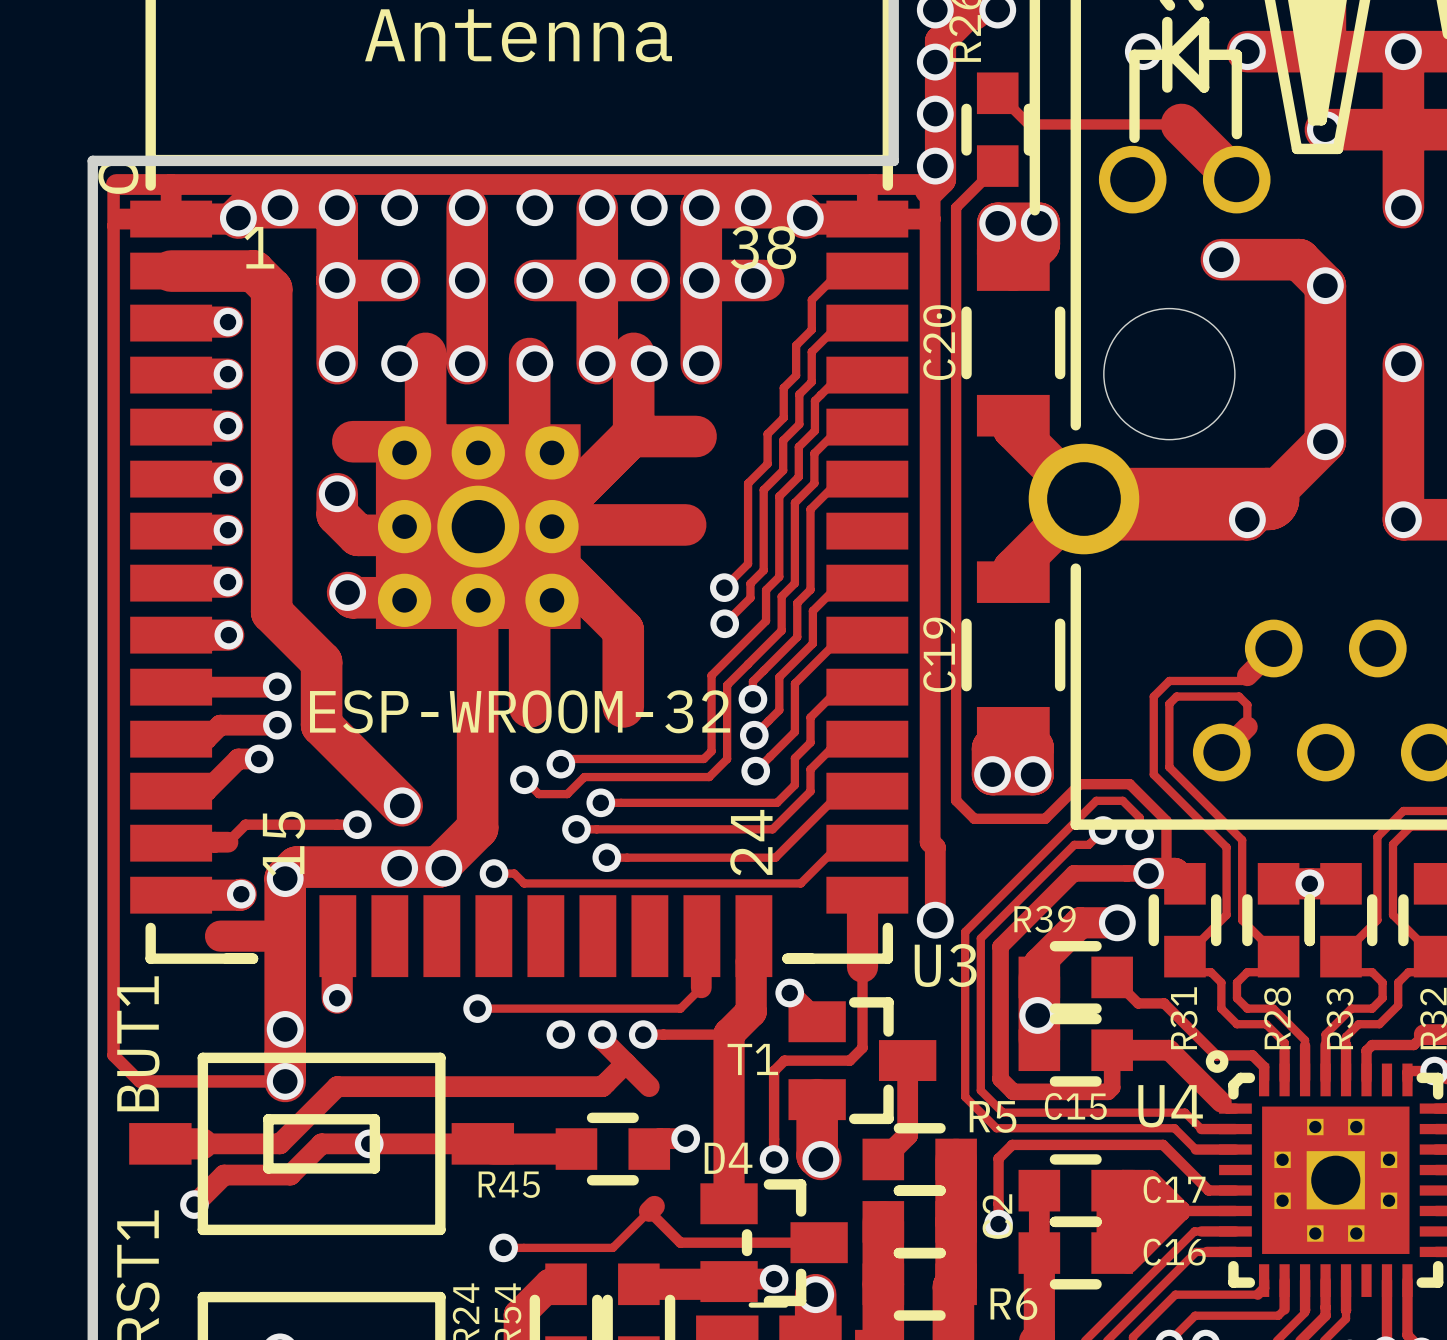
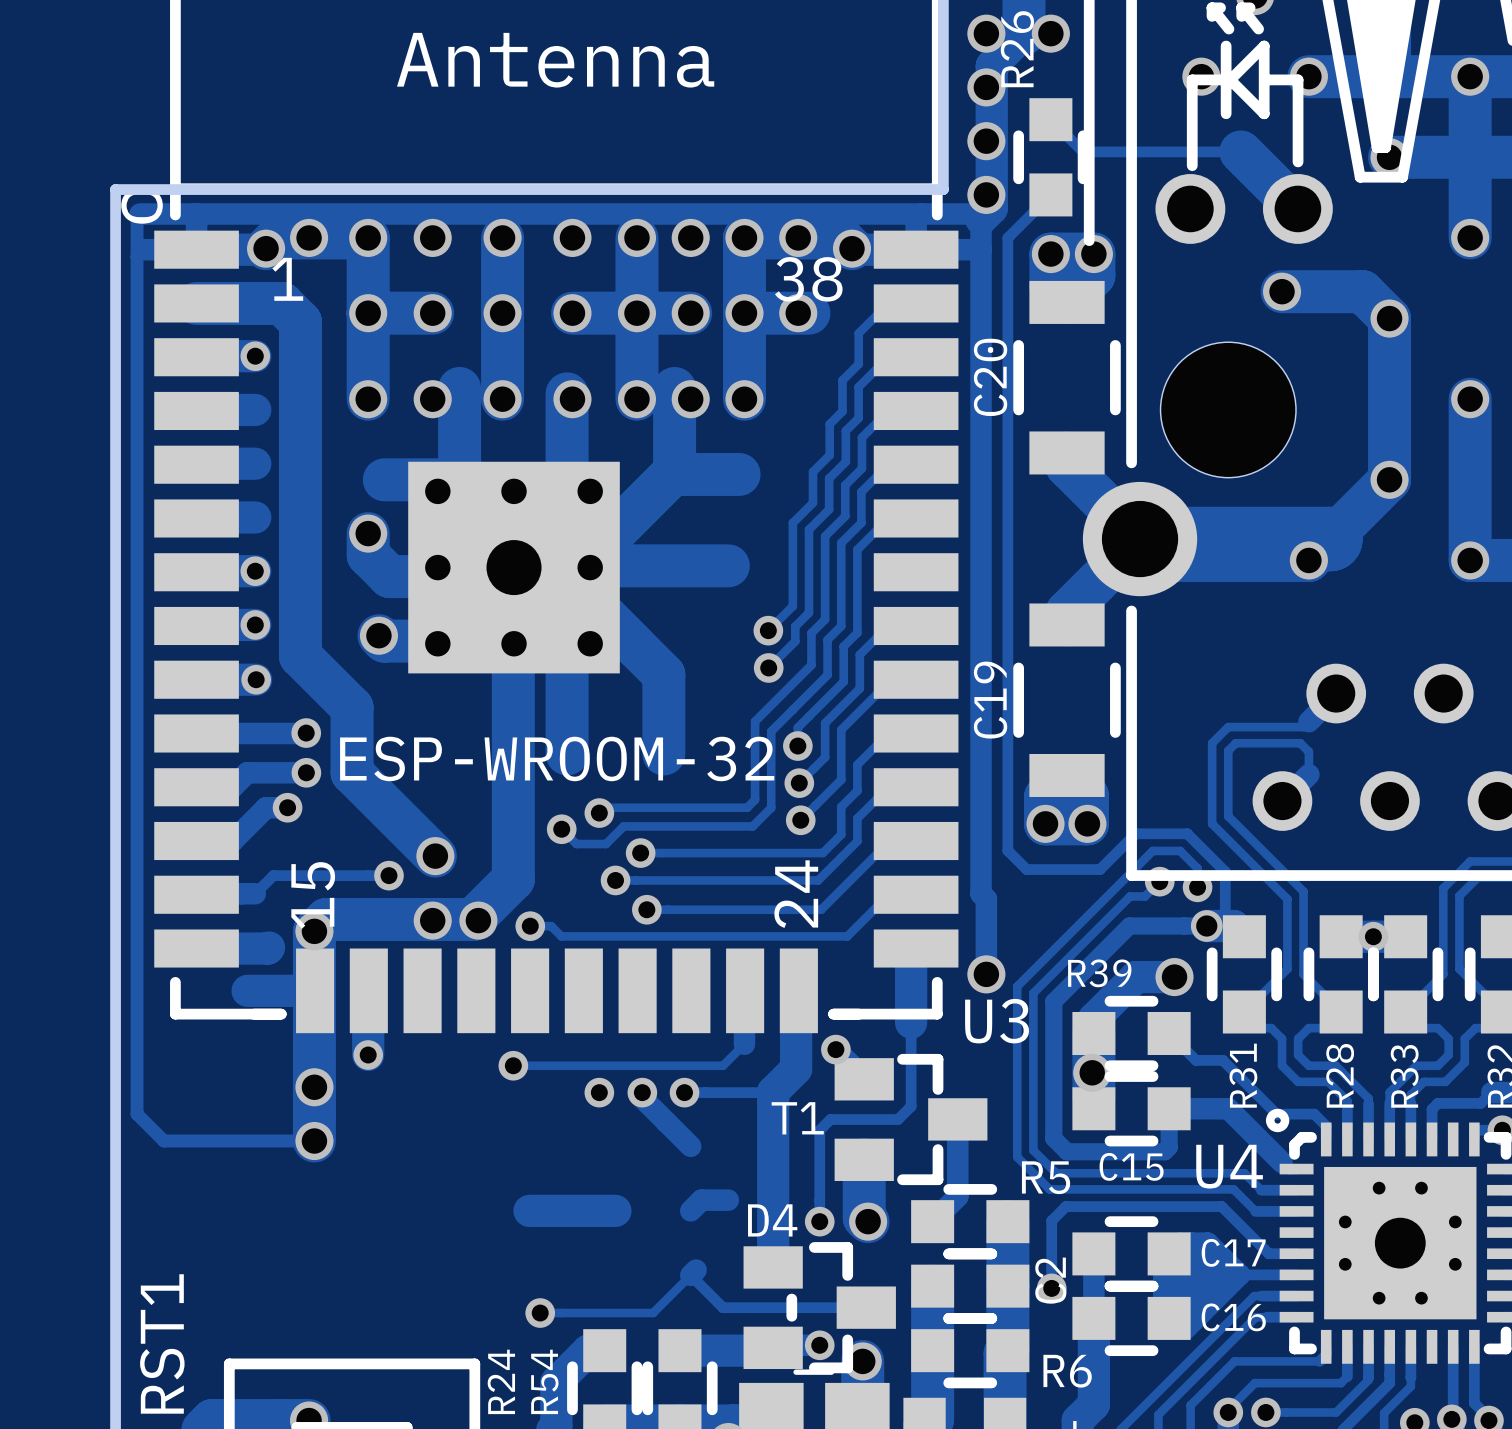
via: (227, 374) -> none
via: (227, 426) -> none
via: (227, 478) -> none
via: (241, 894) -> none
track: (625, 1063) (602, 1086) (337, 1086) (280, 1143) (155, 1143) -> none
via: (685, 1138) -> none
BUT1: (321, 1143) -> none
via: (369, 1143) -> none
track: (488, 1143) (321, 1143) (290, 1175) (224, 1175) (194, 1204) -> none
R45: (612, 1149) -> none
via: (194, 1204) -> none

